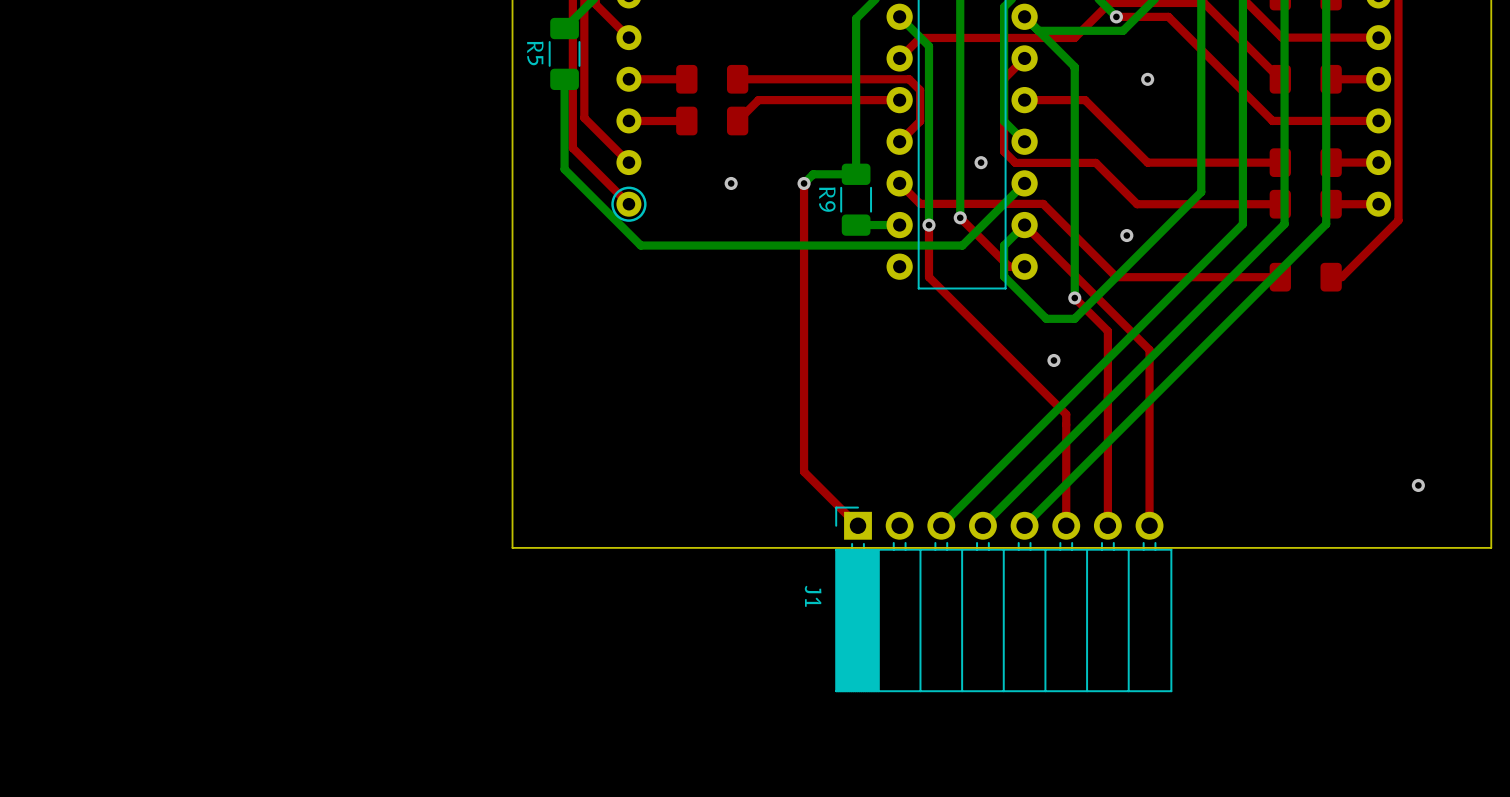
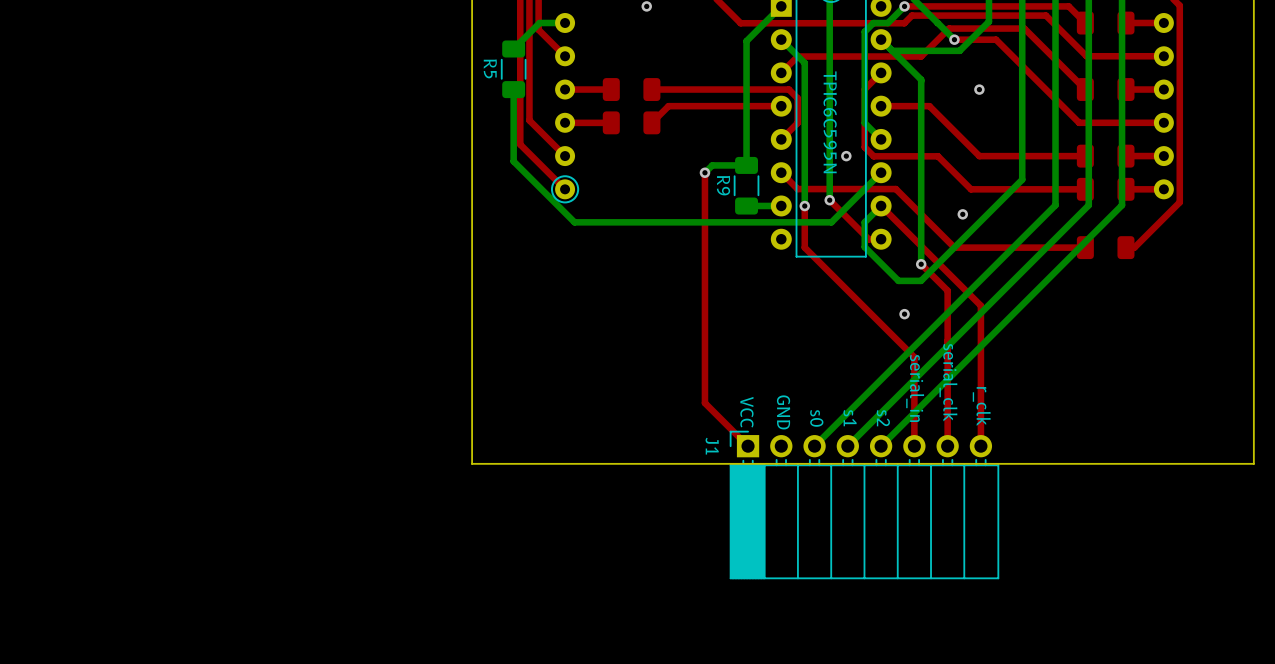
drawing: none -> [823, 71, 837, 174]
via: (731, 183) -> none
text: none -> serial_clk (948, 382)
text: none -> serial_in (915, 388)
text: none -> r_clk (981, 406)
text: none -> VCC (746, 412)
text: none -> GND (783, 412)
via: (1418, 485) -> none
text: none -> s1 (850, 418)
text: none -> s2 (883, 418)
text: none -> s0 (816, 418)
J1 name position: J1 (813, 596) -> J1 (712, 446)

